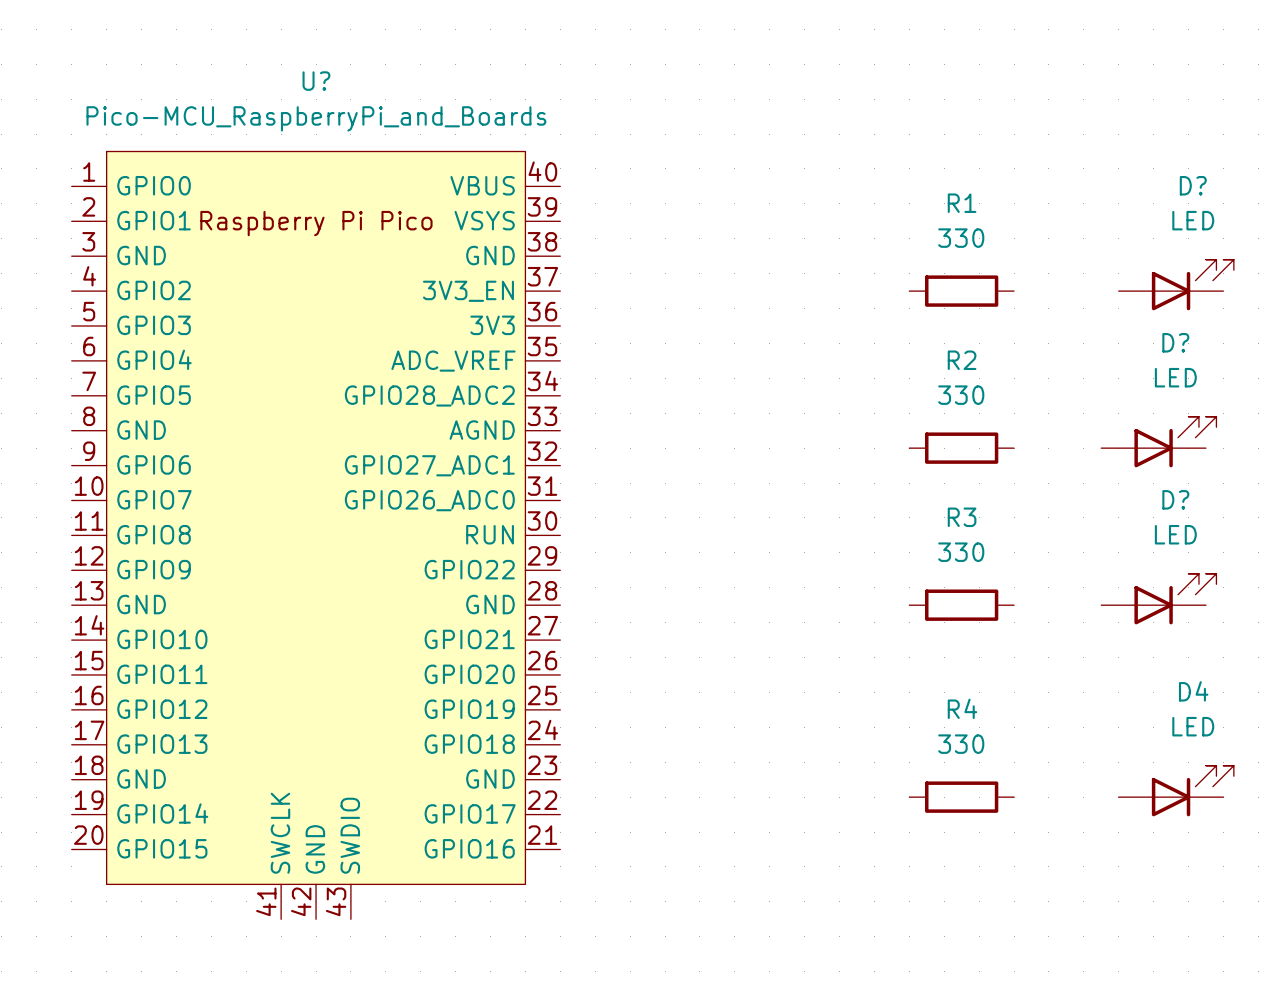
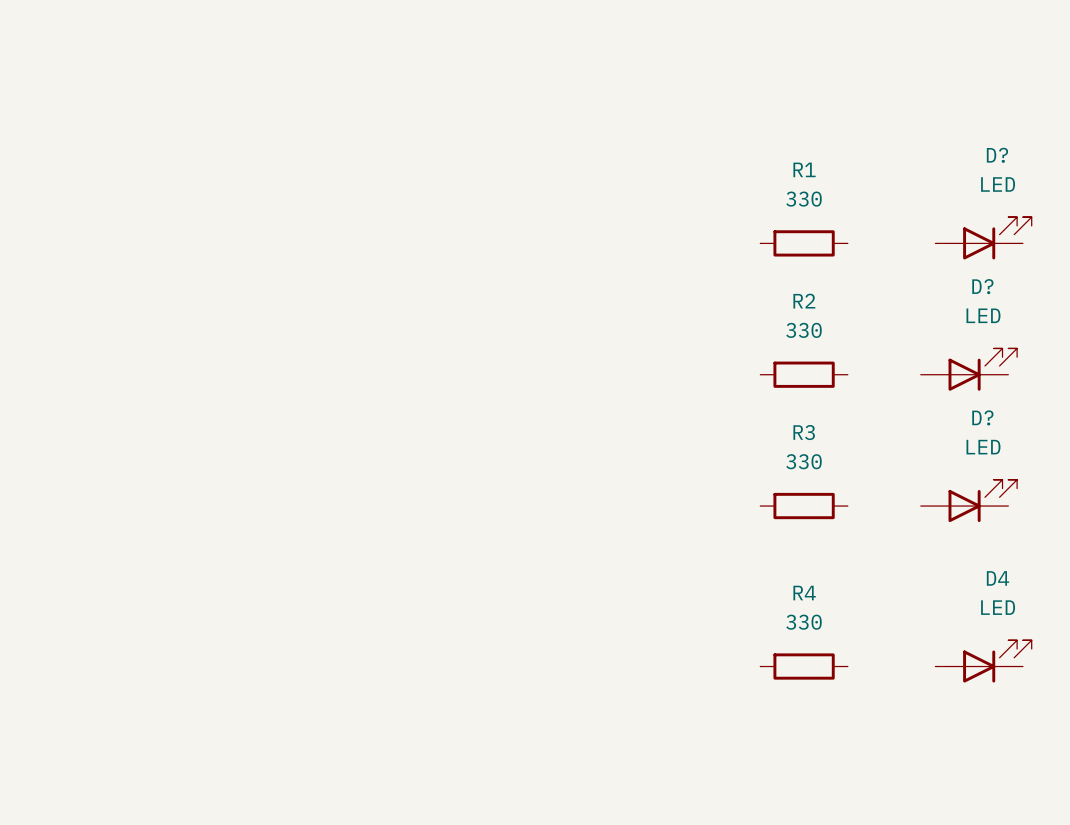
U?: Pico-MCU_RaspberryPi_and_Boards (316, 535) -> none

